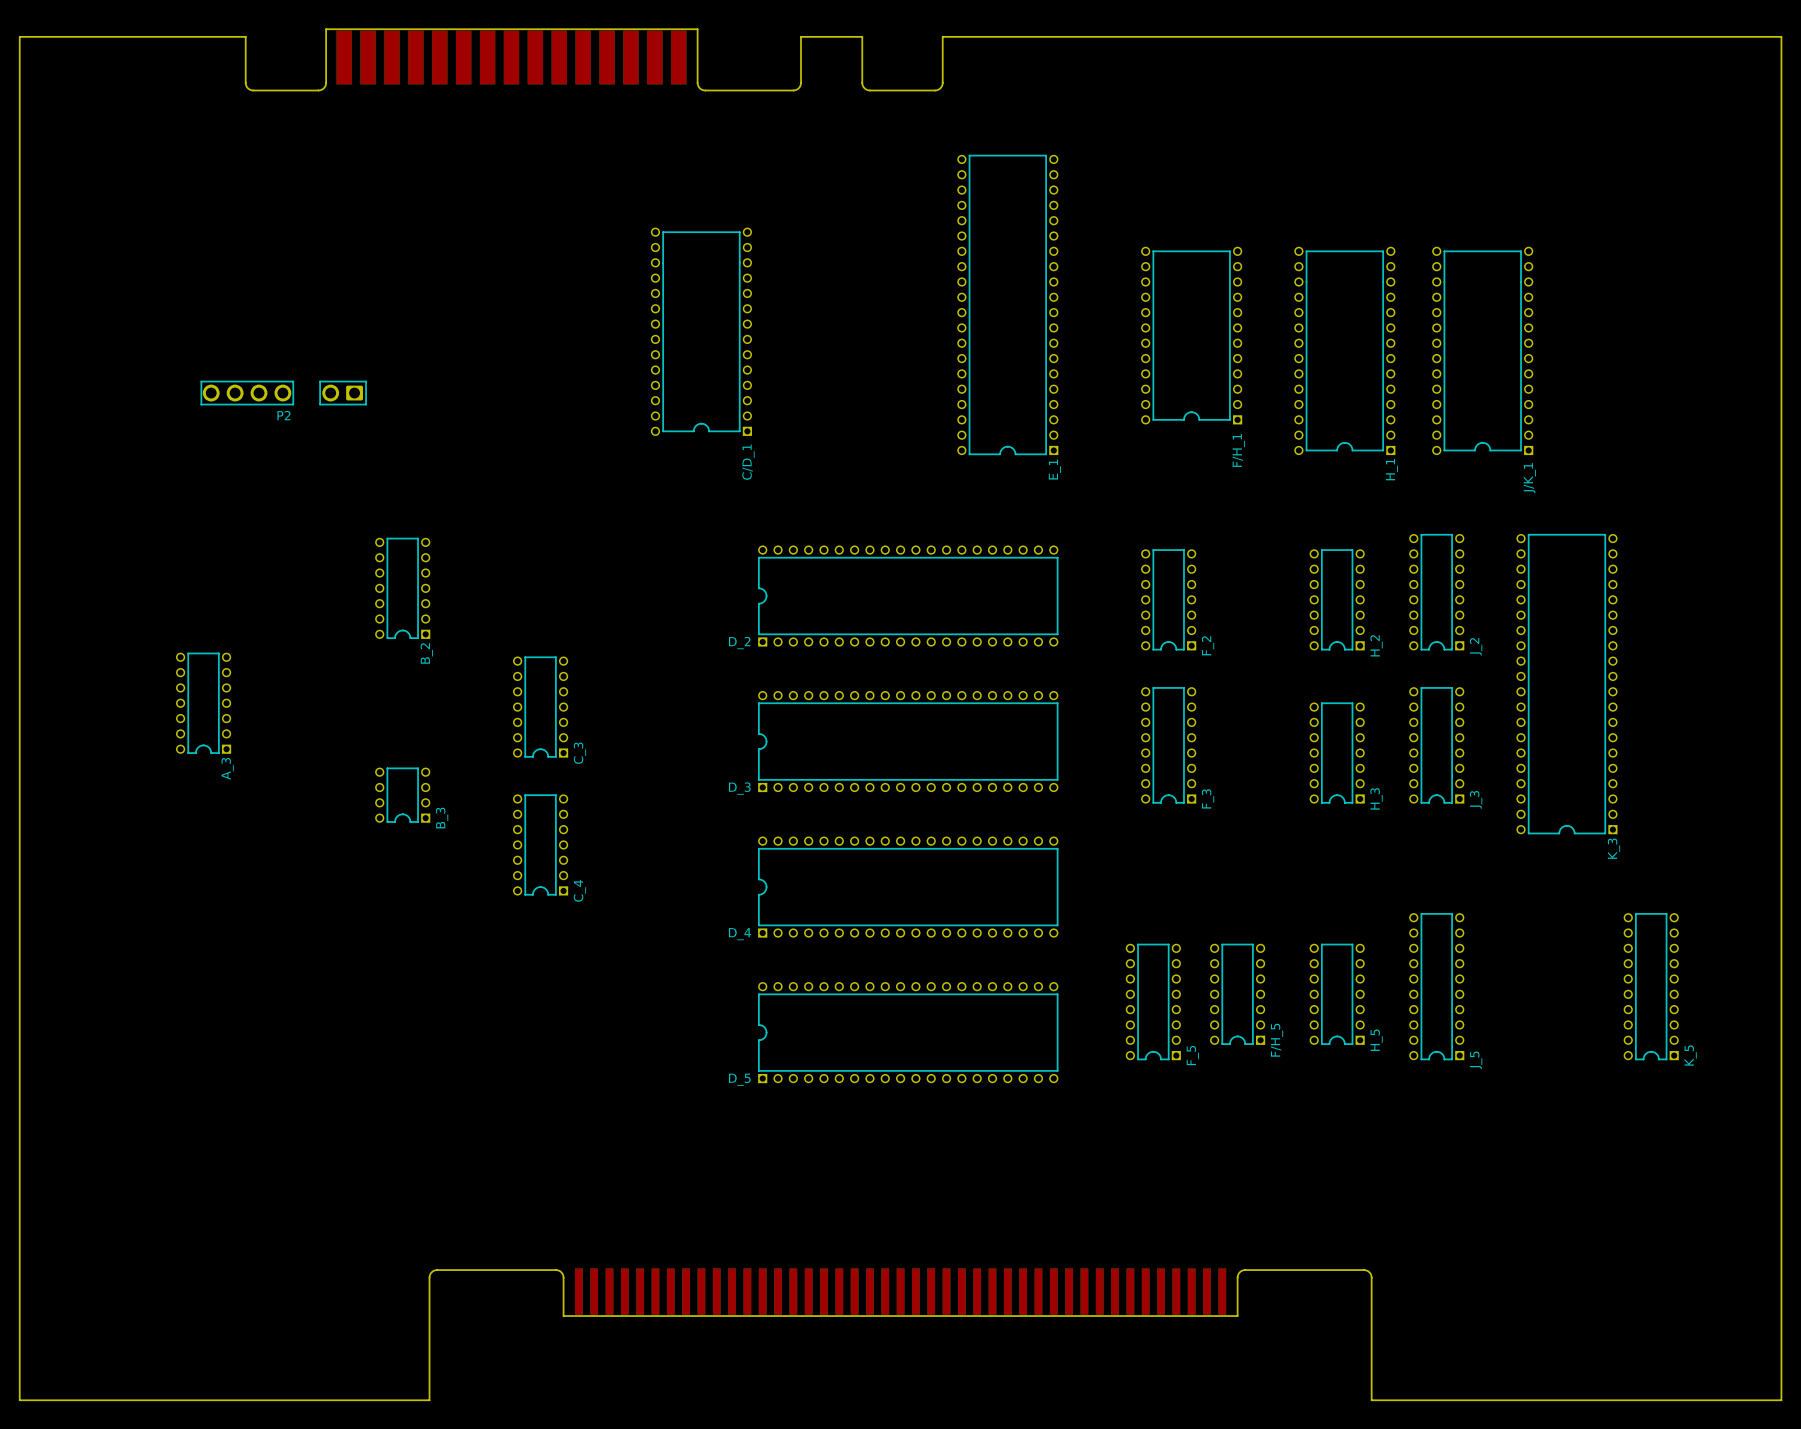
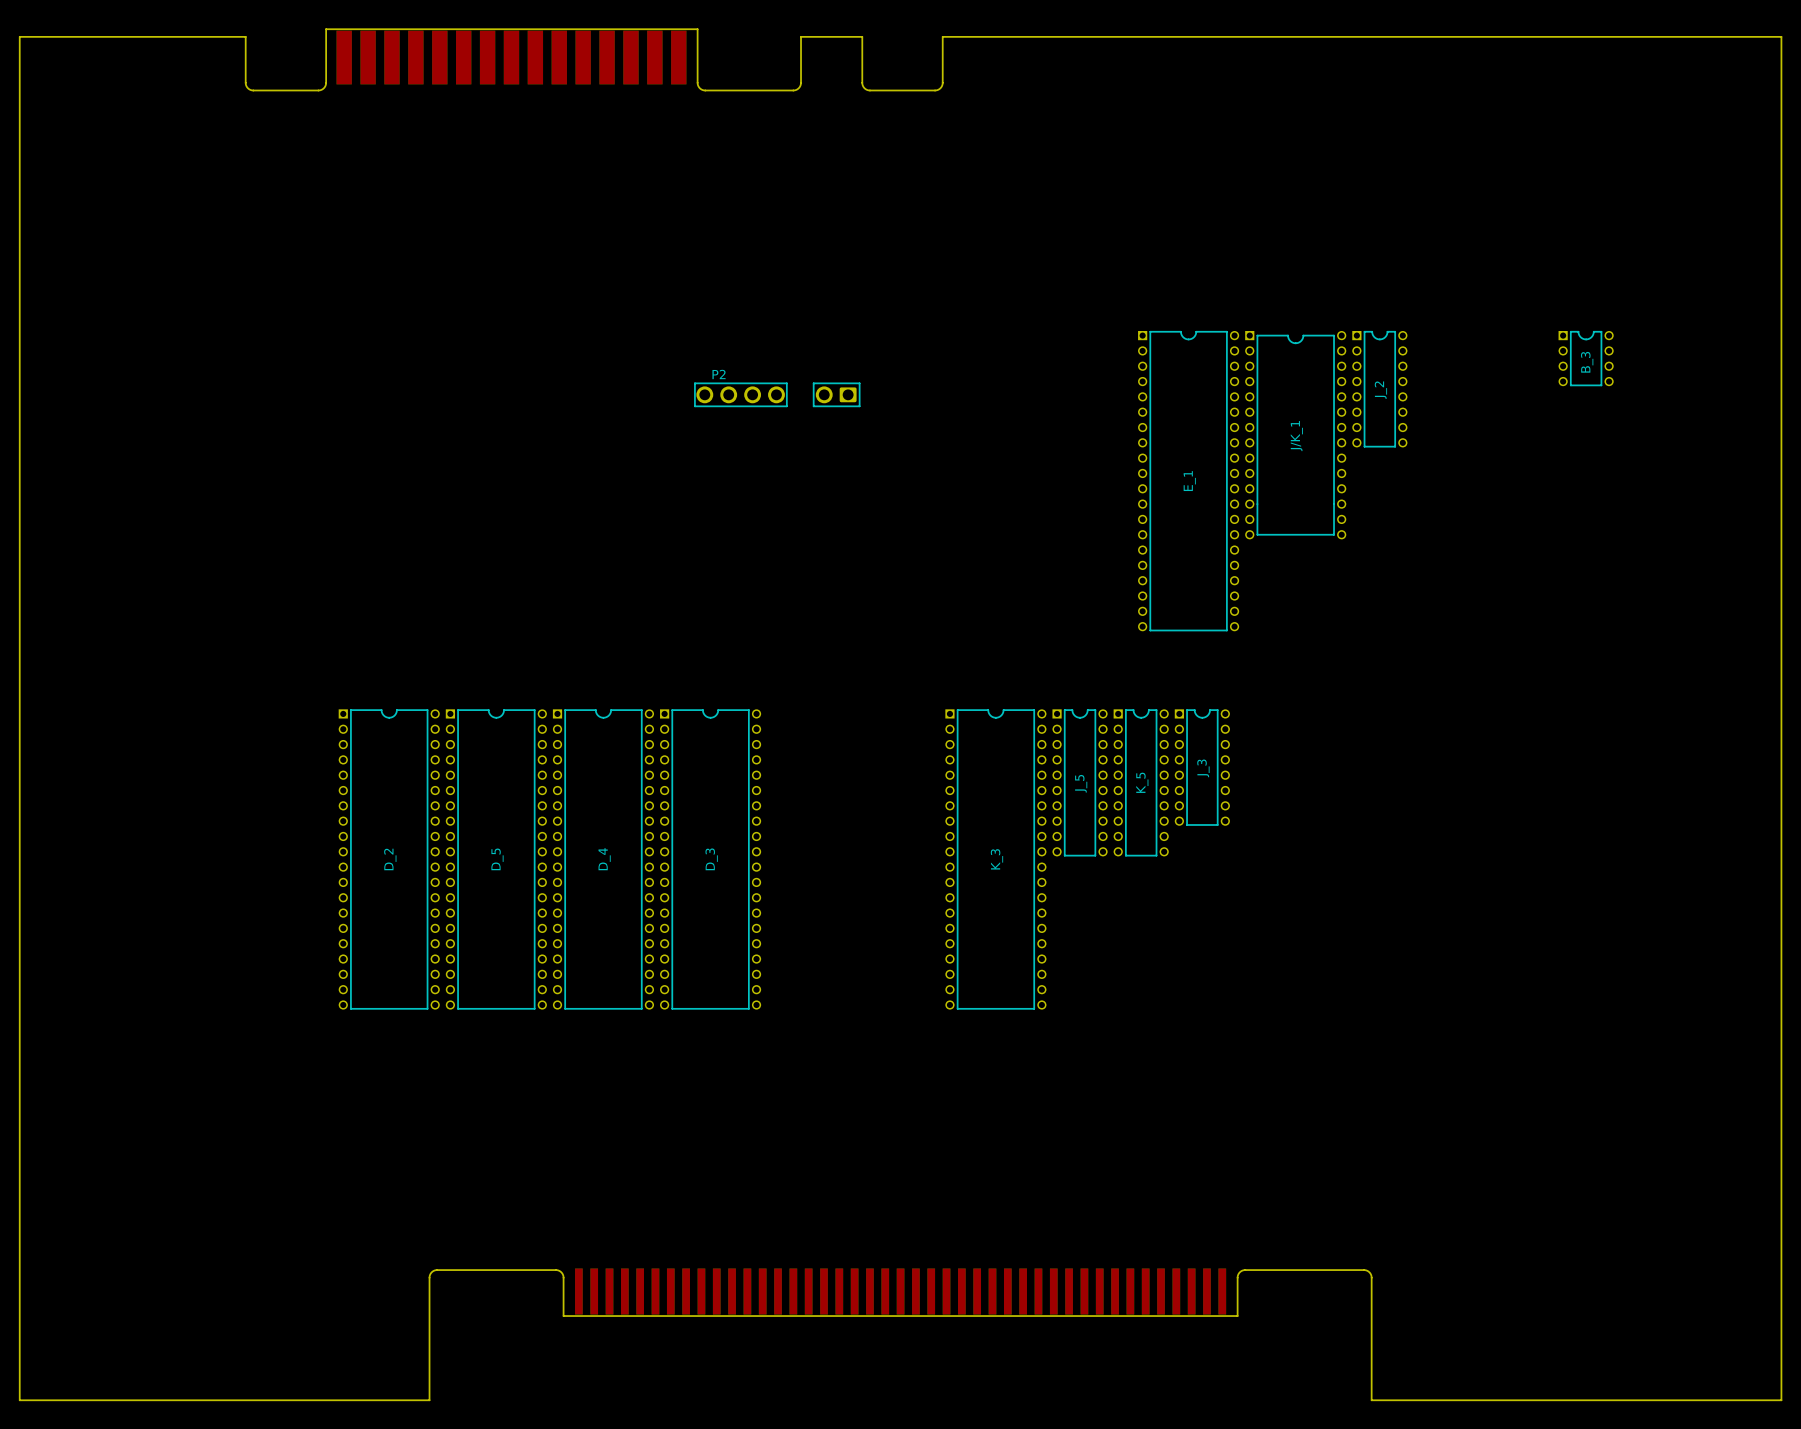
E_1 rotation: 0° (1007, 304) -> 180° (1188, 481)
E_1 position: (1007, 304) -> (1188, 481)
C/D_1: (701, 331) -> none
F/H_1: (1191, 335) -> none
H_1: (1344, 350) -> none
J/K_1 rotation: 0° (1482, 350) -> 180° (1295, 435)
J/K_1 position: (1482, 350) -> (1295, 435)
P2 position: (283, 393) -> (777, 394)
P2 name position: P2 (283, 415) -> P2 (719, 374)
E_1 name position: E_1 (1054, 469) -> E_1 (1189, 481)
J/K_1 name position: J/K_1 (1529, 478) -> J/K_1 (1296, 436)
B_2: (402, 588) -> none
J_2 rotation: 0° (1436, 592) -> 180° (1379, 389)
J_2 position: (1436, 592) -> (1379, 389)
D_2 rotation: 0° (908, 596) -> 90° clockwise (389, 859)
D_2 position: (908, 596) -> (389, 859)
F_2: (1168, 599) -> none
H_2: (1337, 599) -> none
D_2 name position: D_2 (739, 643) -> D_2 (390, 859)
J_2 name position: J_2 (1476, 646) -> J_2 (1380, 390)
K_3 rotation: 0° (1566, 684) -> 180° (995, 859)
K_3 position: (1566, 684) -> (995, 859)
A_3: (203, 703) -> none
C_3: (540, 707) -> none
D_3 rotation: 0° (908, 741) -> 90° clockwise (710, 859)
D_3 position: (908, 741) -> (710, 859)
F_3: (1168, 745) -> none
J_3 rotation: 0° (1436, 745) -> 180° (1202, 767)
J_3 position: (1436, 745) -> (1202, 767)
H_3: (1337, 753) -> none
D_3 name position: D_3 (739, 788) -> D_3 (711, 859)
B_3 rotation: 0° (402, 795) -> 180° (1586, 358)
B_3 position: (402, 795) -> (1586, 358)
J_3 name position: J_3 (1476, 799) -> J_3 (1203, 768)
B_3 name position: B_3 (442, 818) -> B_3 (1587, 362)
C_4: (540, 844) -> none
K_3 name position: K_3 (1613, 848) -> K_3 (996, 859)
D_4 rotation: 0° (908, 887) -> 90° clockwise (603, 859)
D_4 position: (908, 887) -> (603, 859)
D_4 name position: D_4 (740, 934) -> D_4 (604, 859)
J_5 rotation: 0° (1436, 986) -> 180° (1080, 782)
J_5 position: (1436, 986) -> (1080, 782)
K_5 rotation: 0° (1651, 986) -> 180° (1141, 782)
K_5 position: (1651, 986) -> (1141, 782)
F/H_5: (1237, 994) -> none
H_5: (1337, 994) -> none
F_5: (1153, 1001) -> none
D_5 rotation: 0° (908, 1032) -> 90° clockwise (496, 859)
D_5 position: (908, 1032) -> (496, 859)
K_5 name position: K_5 (1690, 1055) -> K_5 (1142, 782)
J_5 name position: J_5 (1476, 1060) -> J_5 (1081, 783)
D_5 name position: D_5 (739, 1079) -> D_5 (497, 859)

